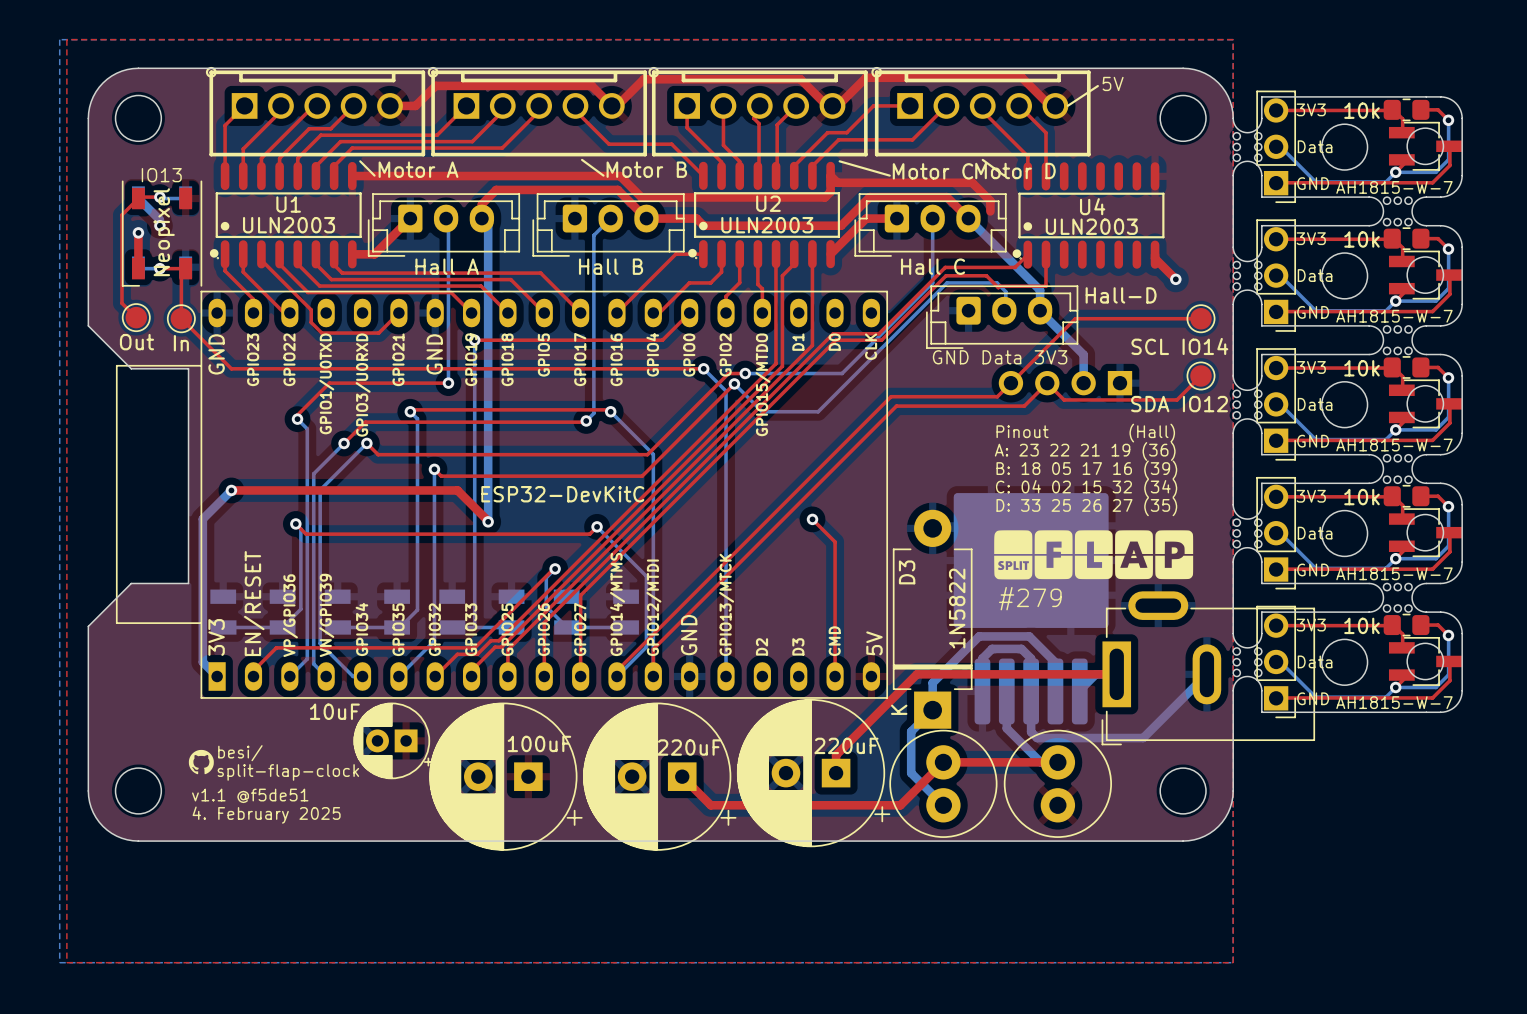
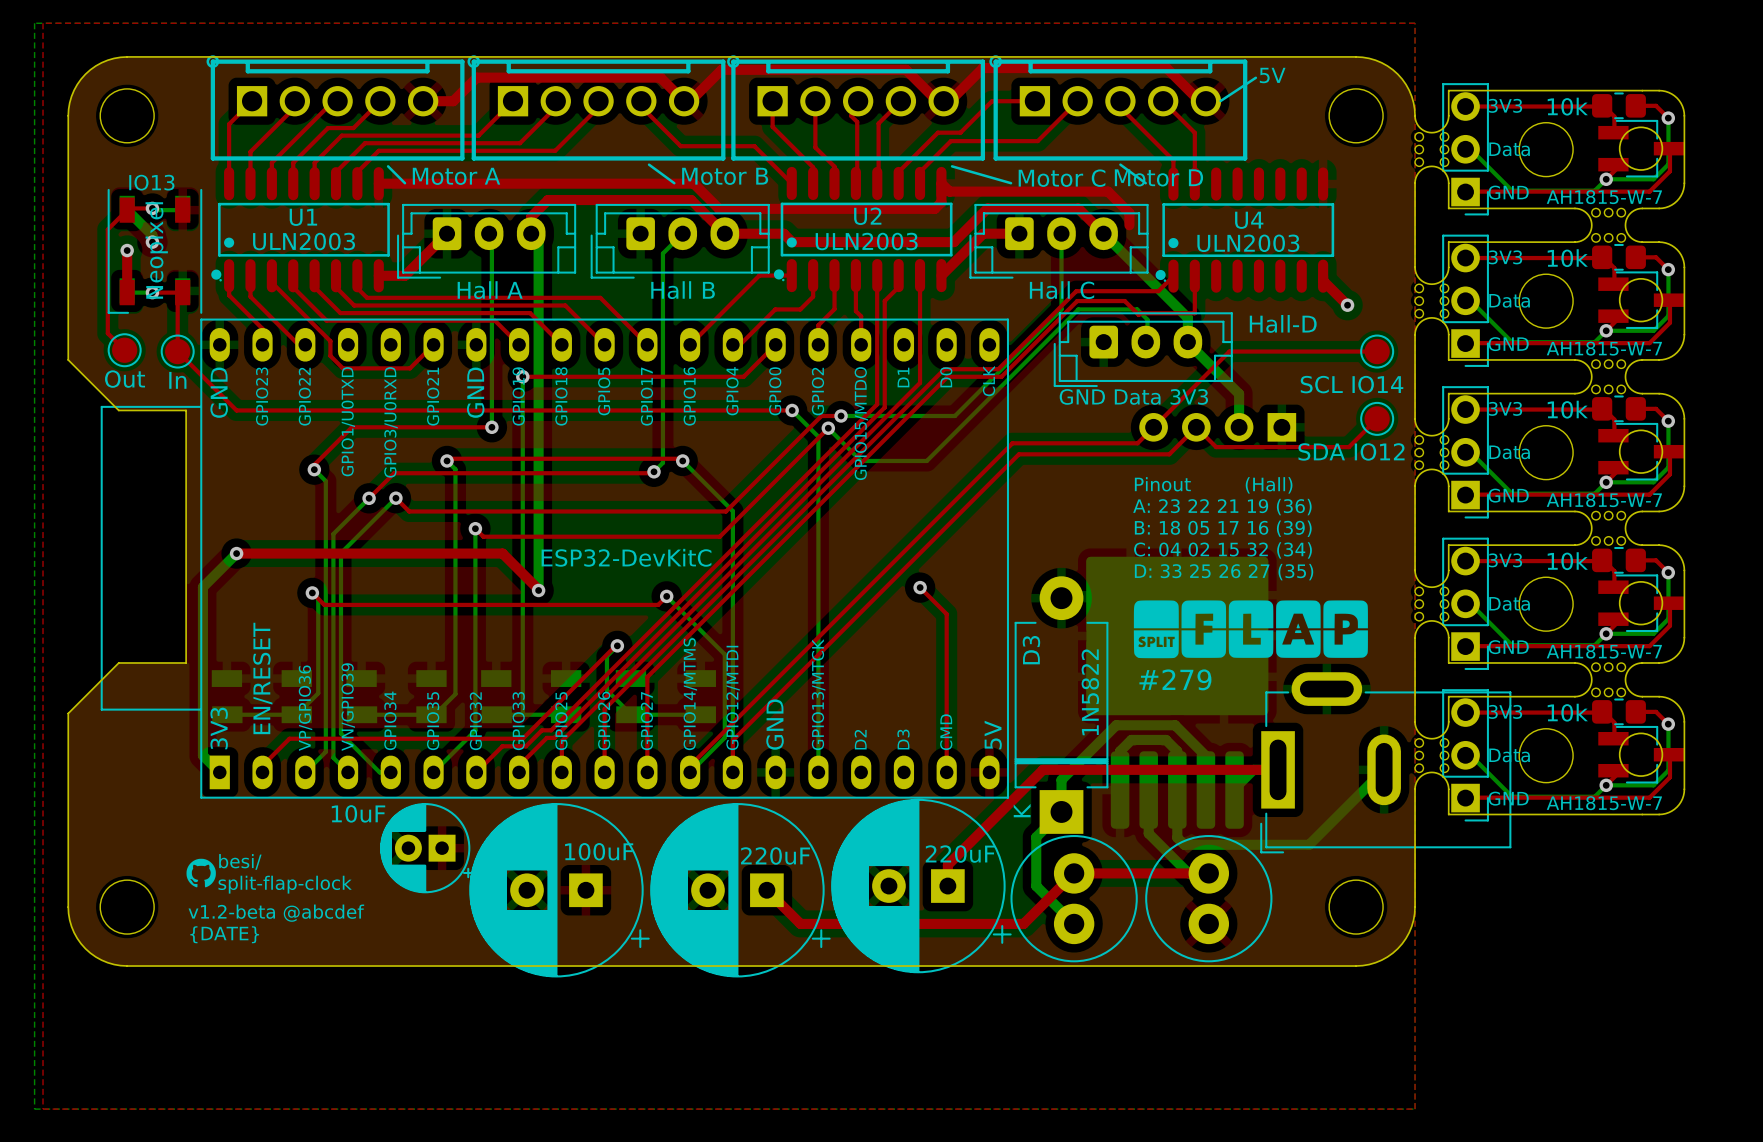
text: v1.1 @f5de51 (250, 795) -> v1.2-beta @abcdef (276, 913)
text: 4. February 2025 (266, 815) -> {DATE} (224, 934)

